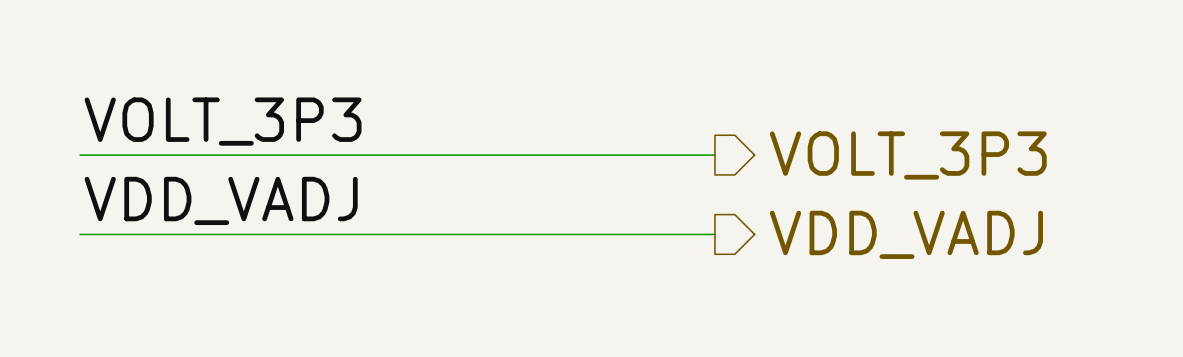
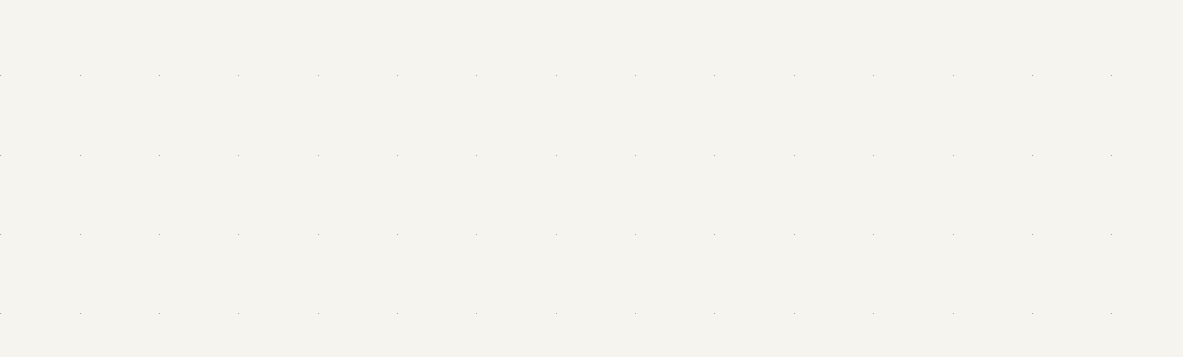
label: VOLT_3P3 (223, 121) -> none
wire: (80, 155) (714, 155) -> none
hierarchical label: VOLT_3P3 (908, 155) -> none
label: VDD_VADJ (221, 200) -> none
wire: (80, 234) (714, 234) -> none
hierarchical label: VDD_VADJ (906, 234) -> none

